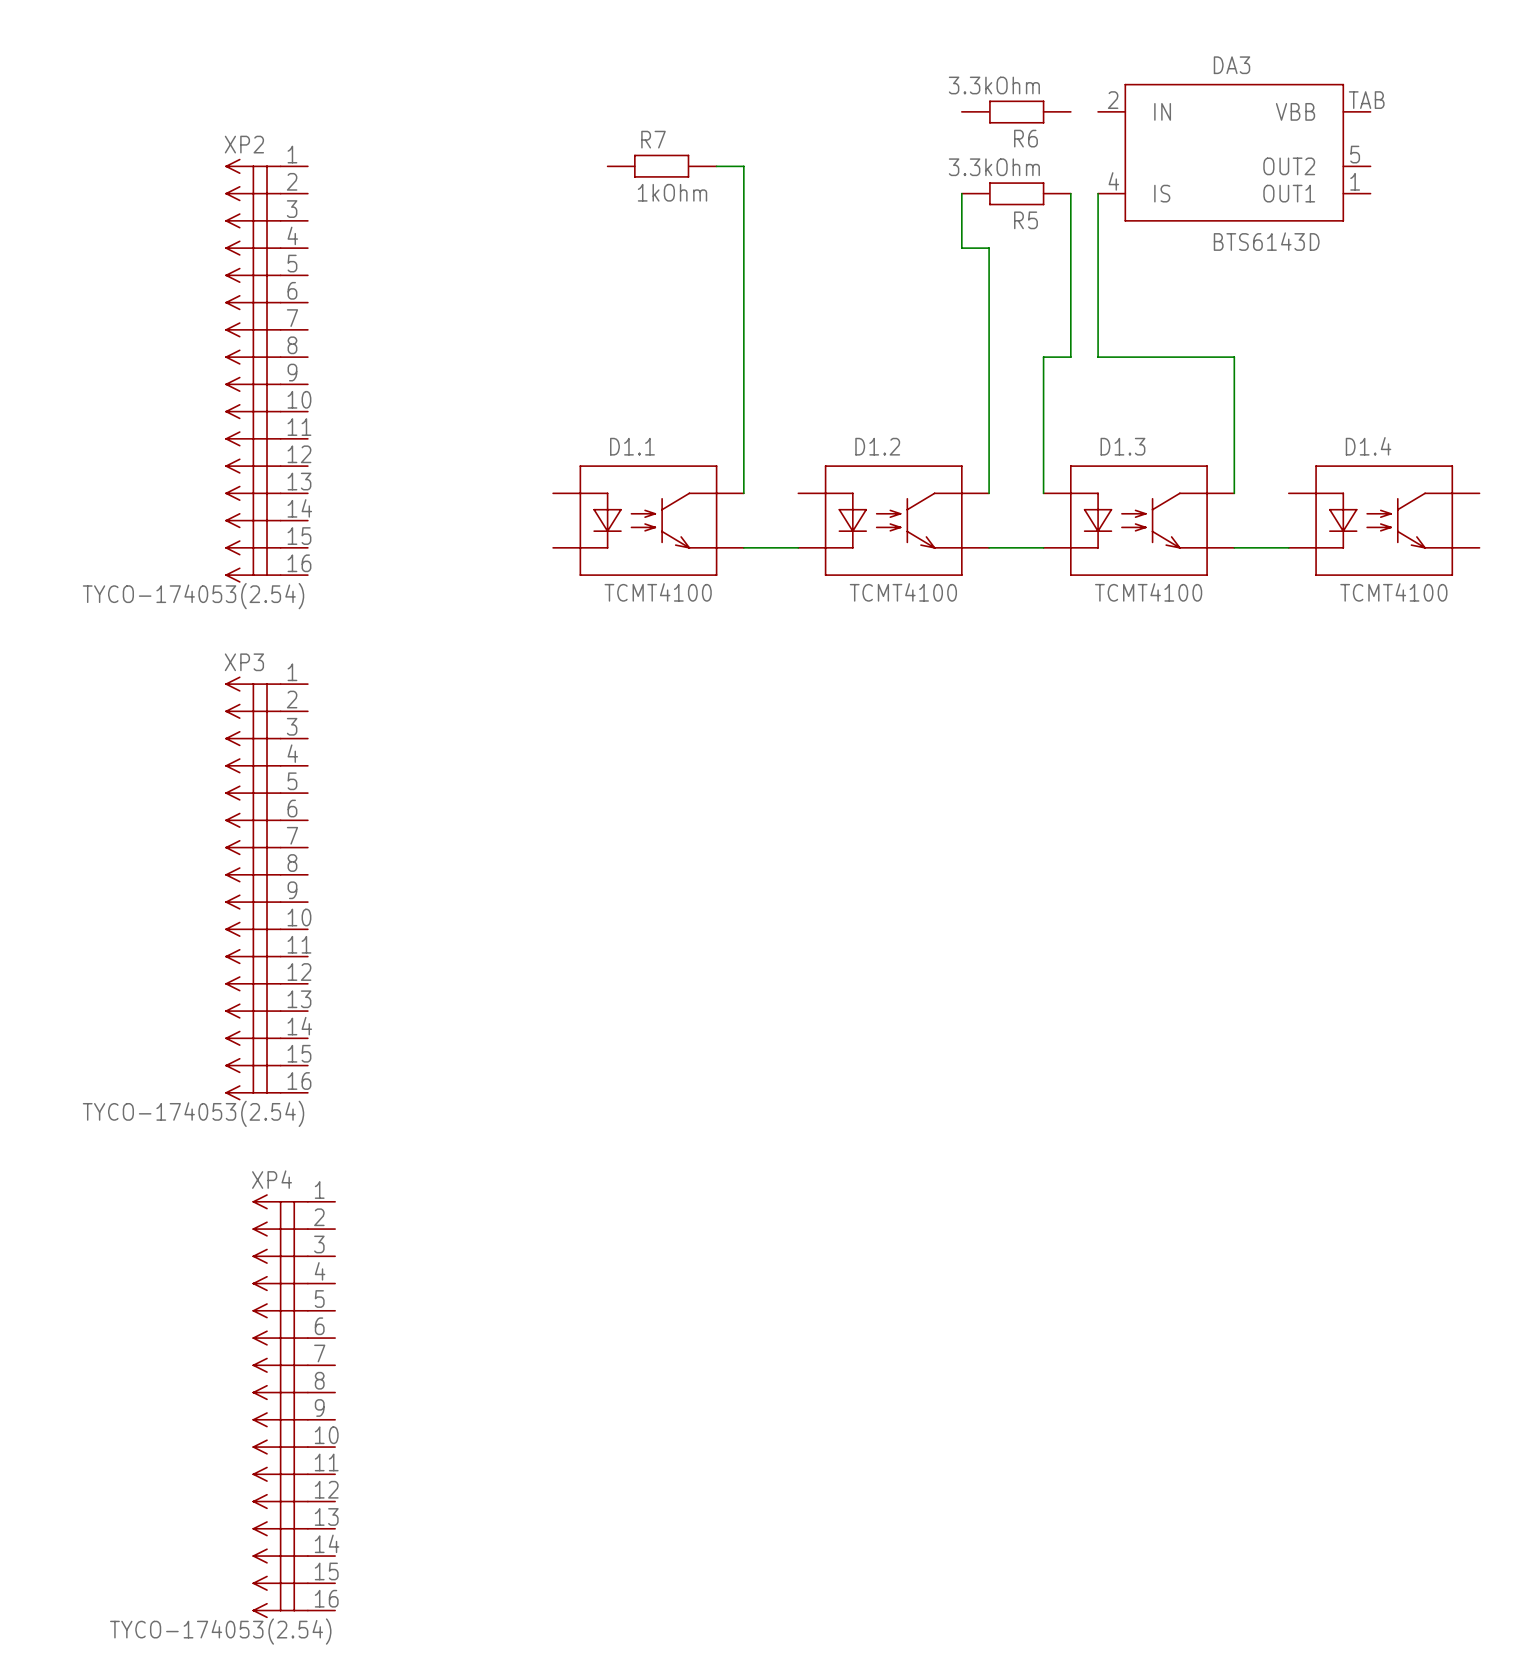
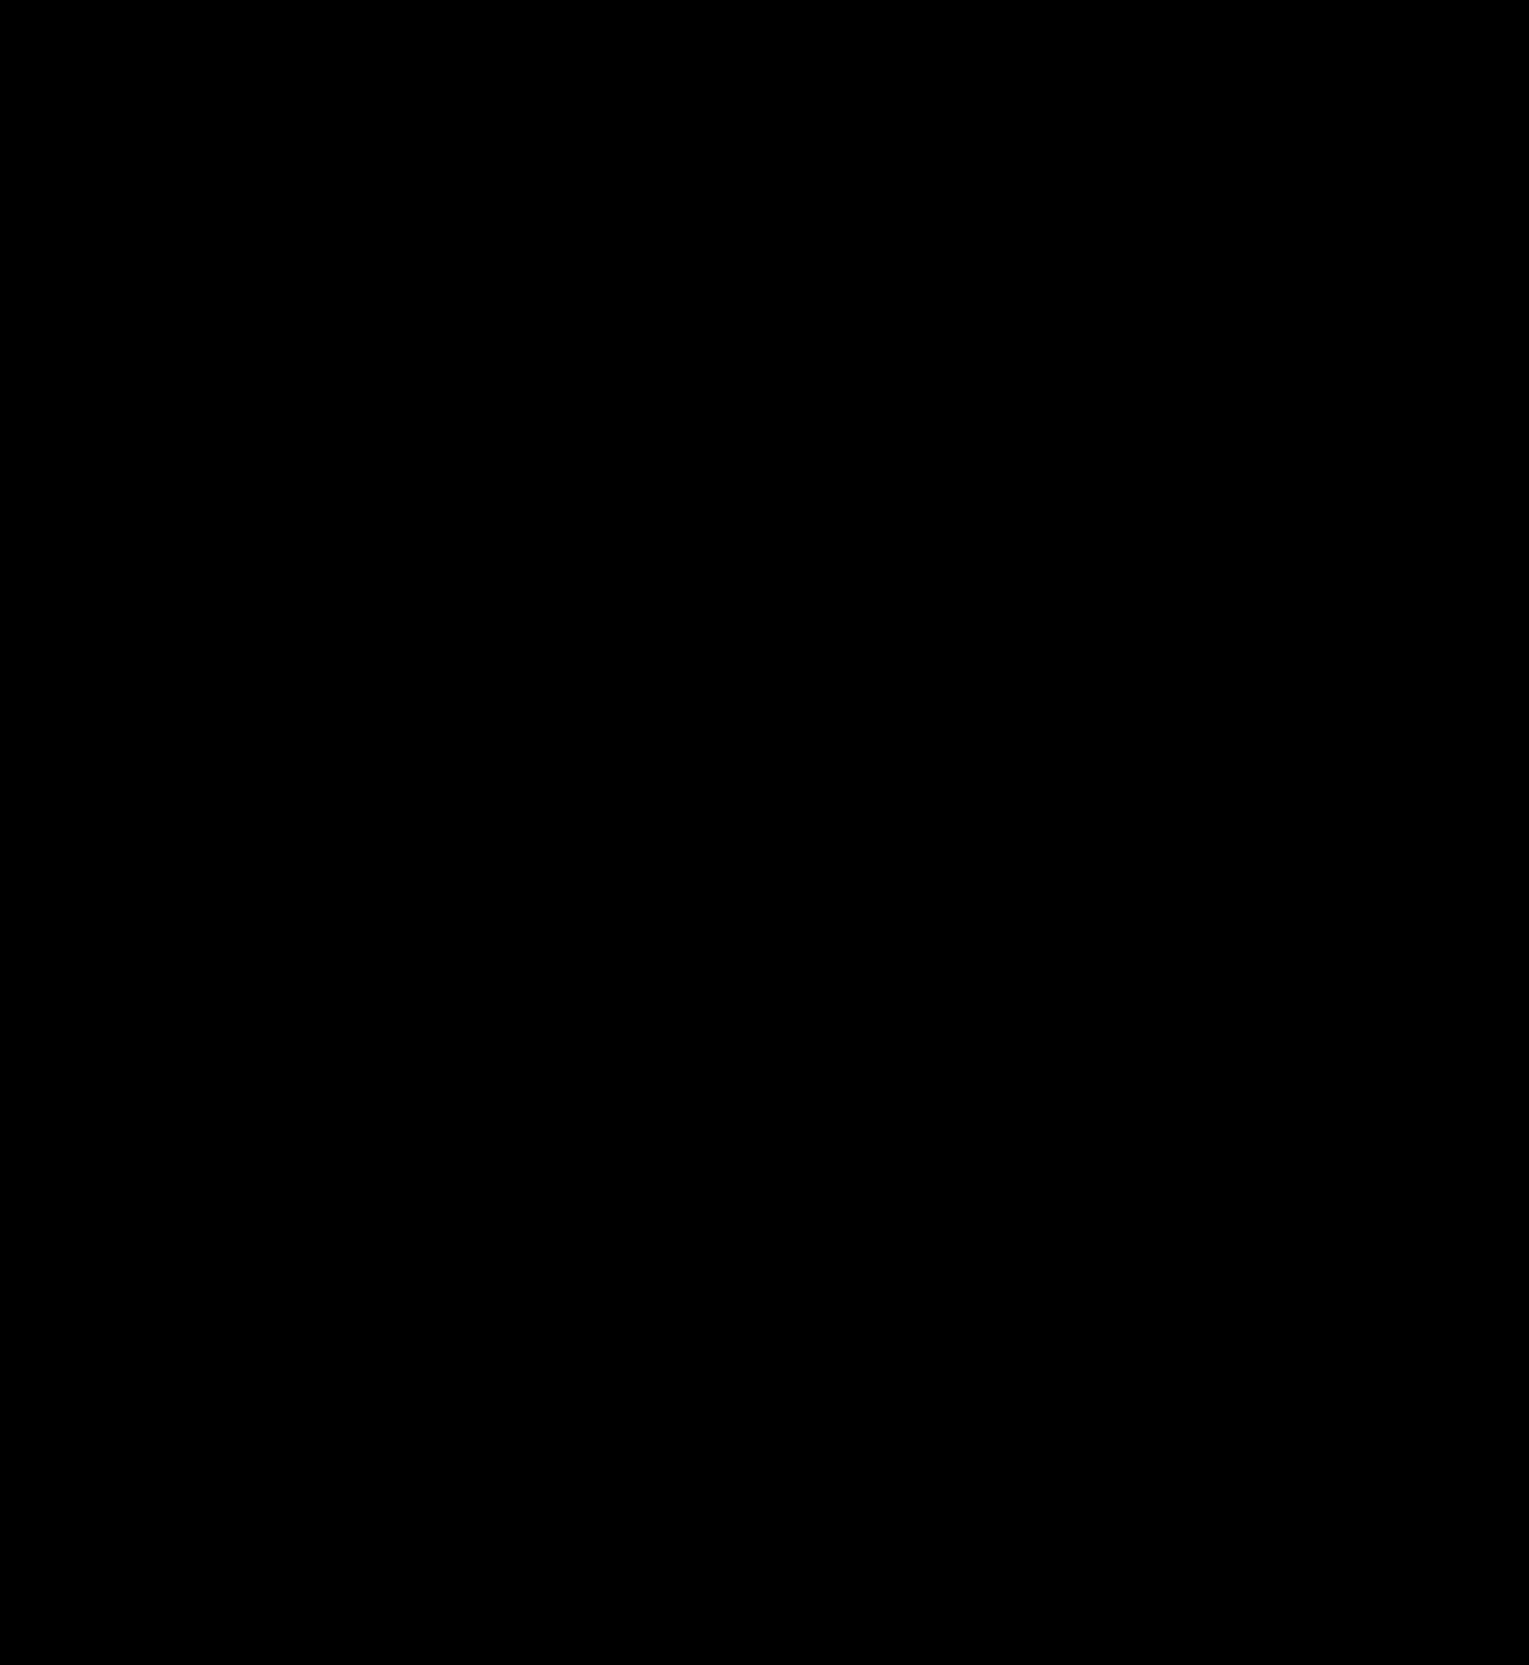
R6: 3.3kOhm (1016, 112) -> none
DA3: BTS6143D (1234, 152) -> none
R7: 1kOhm (662, 166) -> none
wire: (716, 166) (743, 166) (743, 493) -> none
wire: (961, 193) (961, 248) (989, 248) (989, 493) -> none
R5: 3.3kOhm (1016, 193) -> none
wire: (1070, 193) (1070, 357) (1043, 357) (1043, 493) -> none
wire: (1098, 193) (1098, 357) (1234, 357) (1234, 493) -> none
XP2: TYCO-174053(2.54) (266, 370) -> none
D1.1: TCMT4100 (648, 520) -> none
D1.2: TCMT4100 (893, 520) -> none
D1.3: TCMT4100 (1138, 520) -> none
D1.4: TCMT4100 (1384, 520) -> none
wire: (743, 547) (798, 547) -> none
wire: (989, 547) (1043, 547) -> none
wire: (1234, 547) (1288, 547) -> none
XP3: TYCO-174053(2.54) (266, 888) -> none
XP4: TYCO-174053(2.54) (293, 1406) -> none

